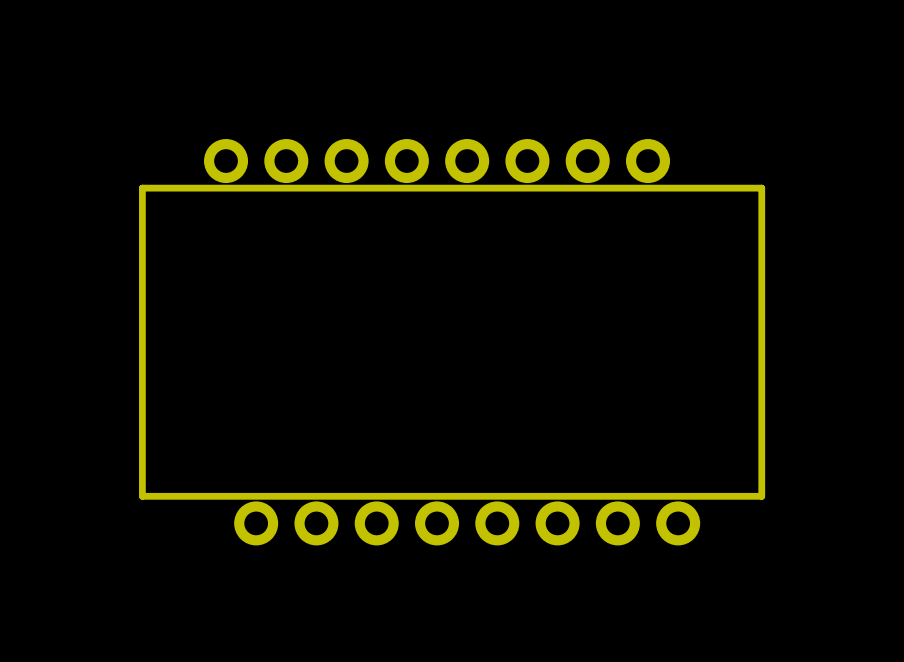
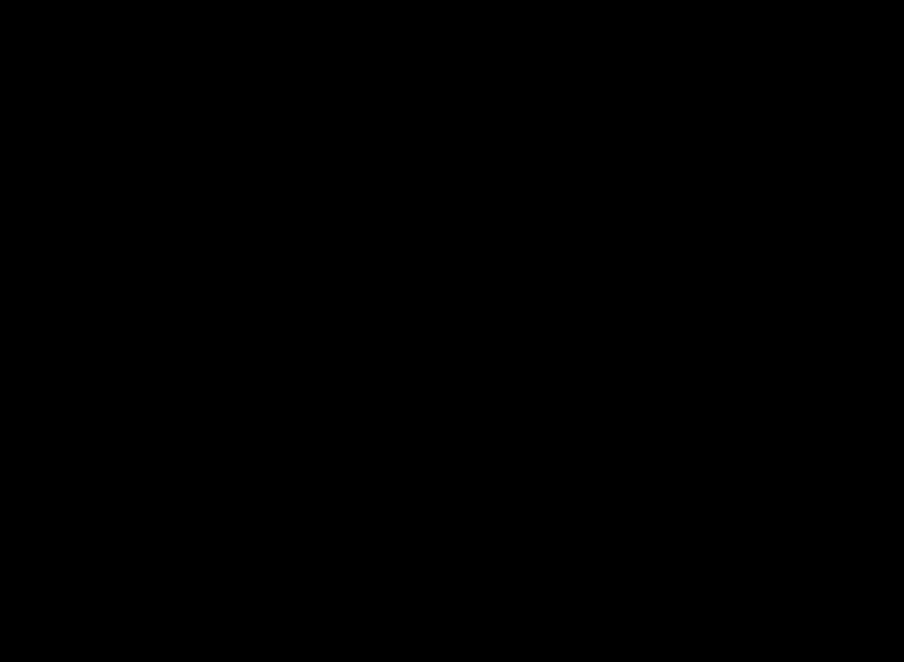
part: (452, 342) -> none

